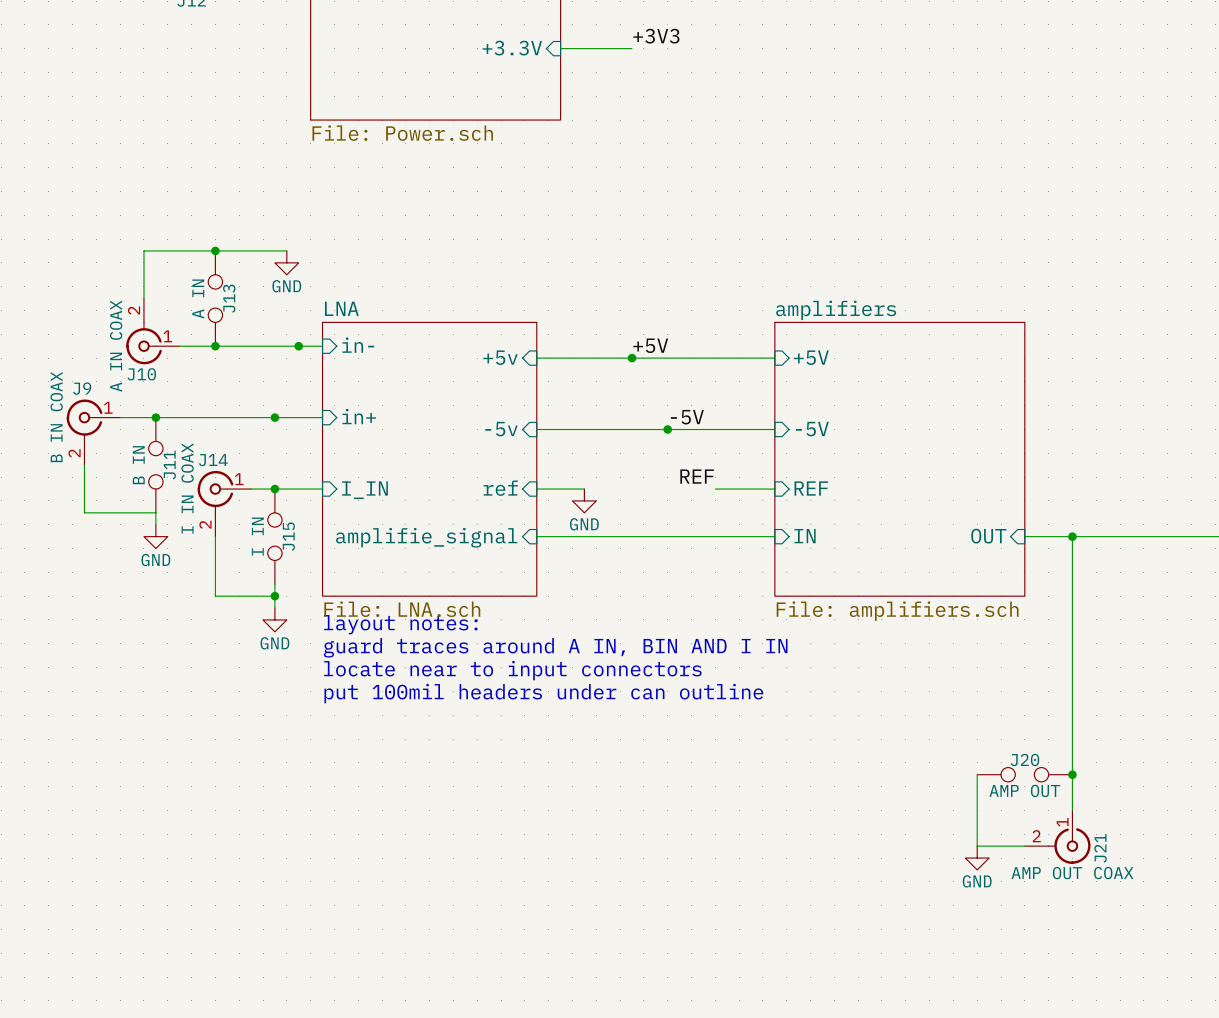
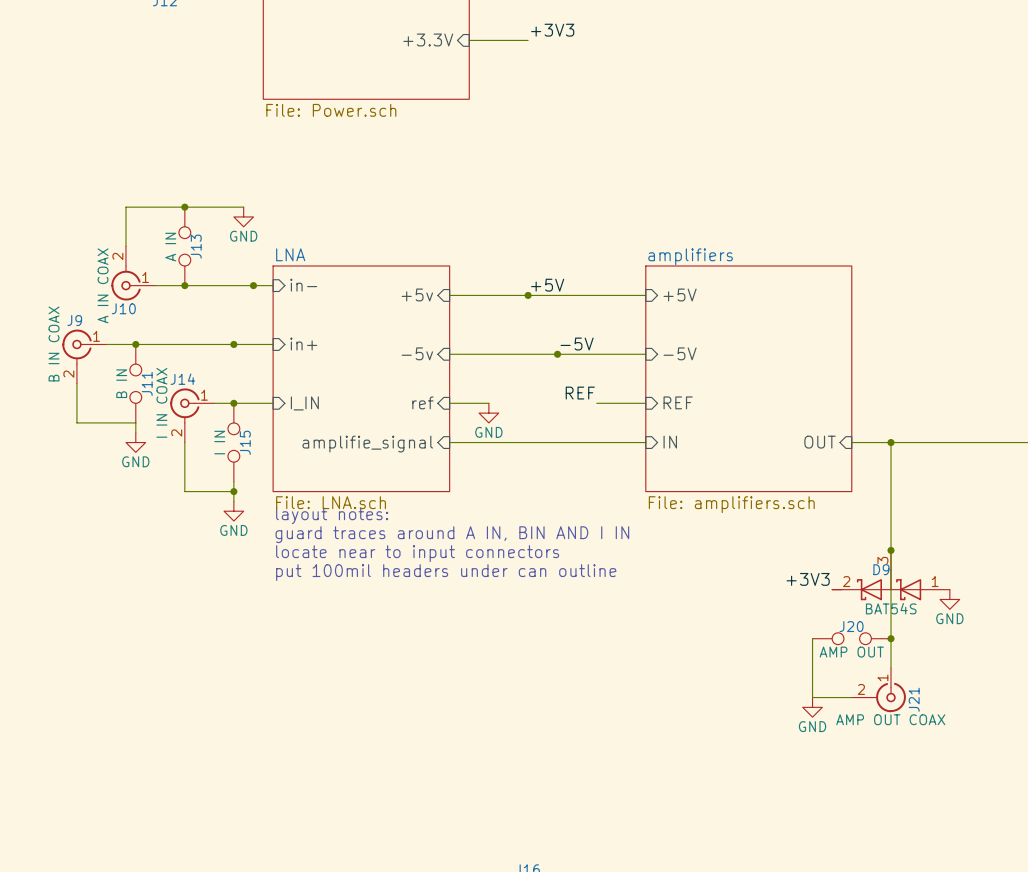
junction: none -> (891, 550)
D9: none -> BAT54S (891, 575)
label: none -> +3V3 (808, 579)
power symbol: none -> GND (949, 599)

